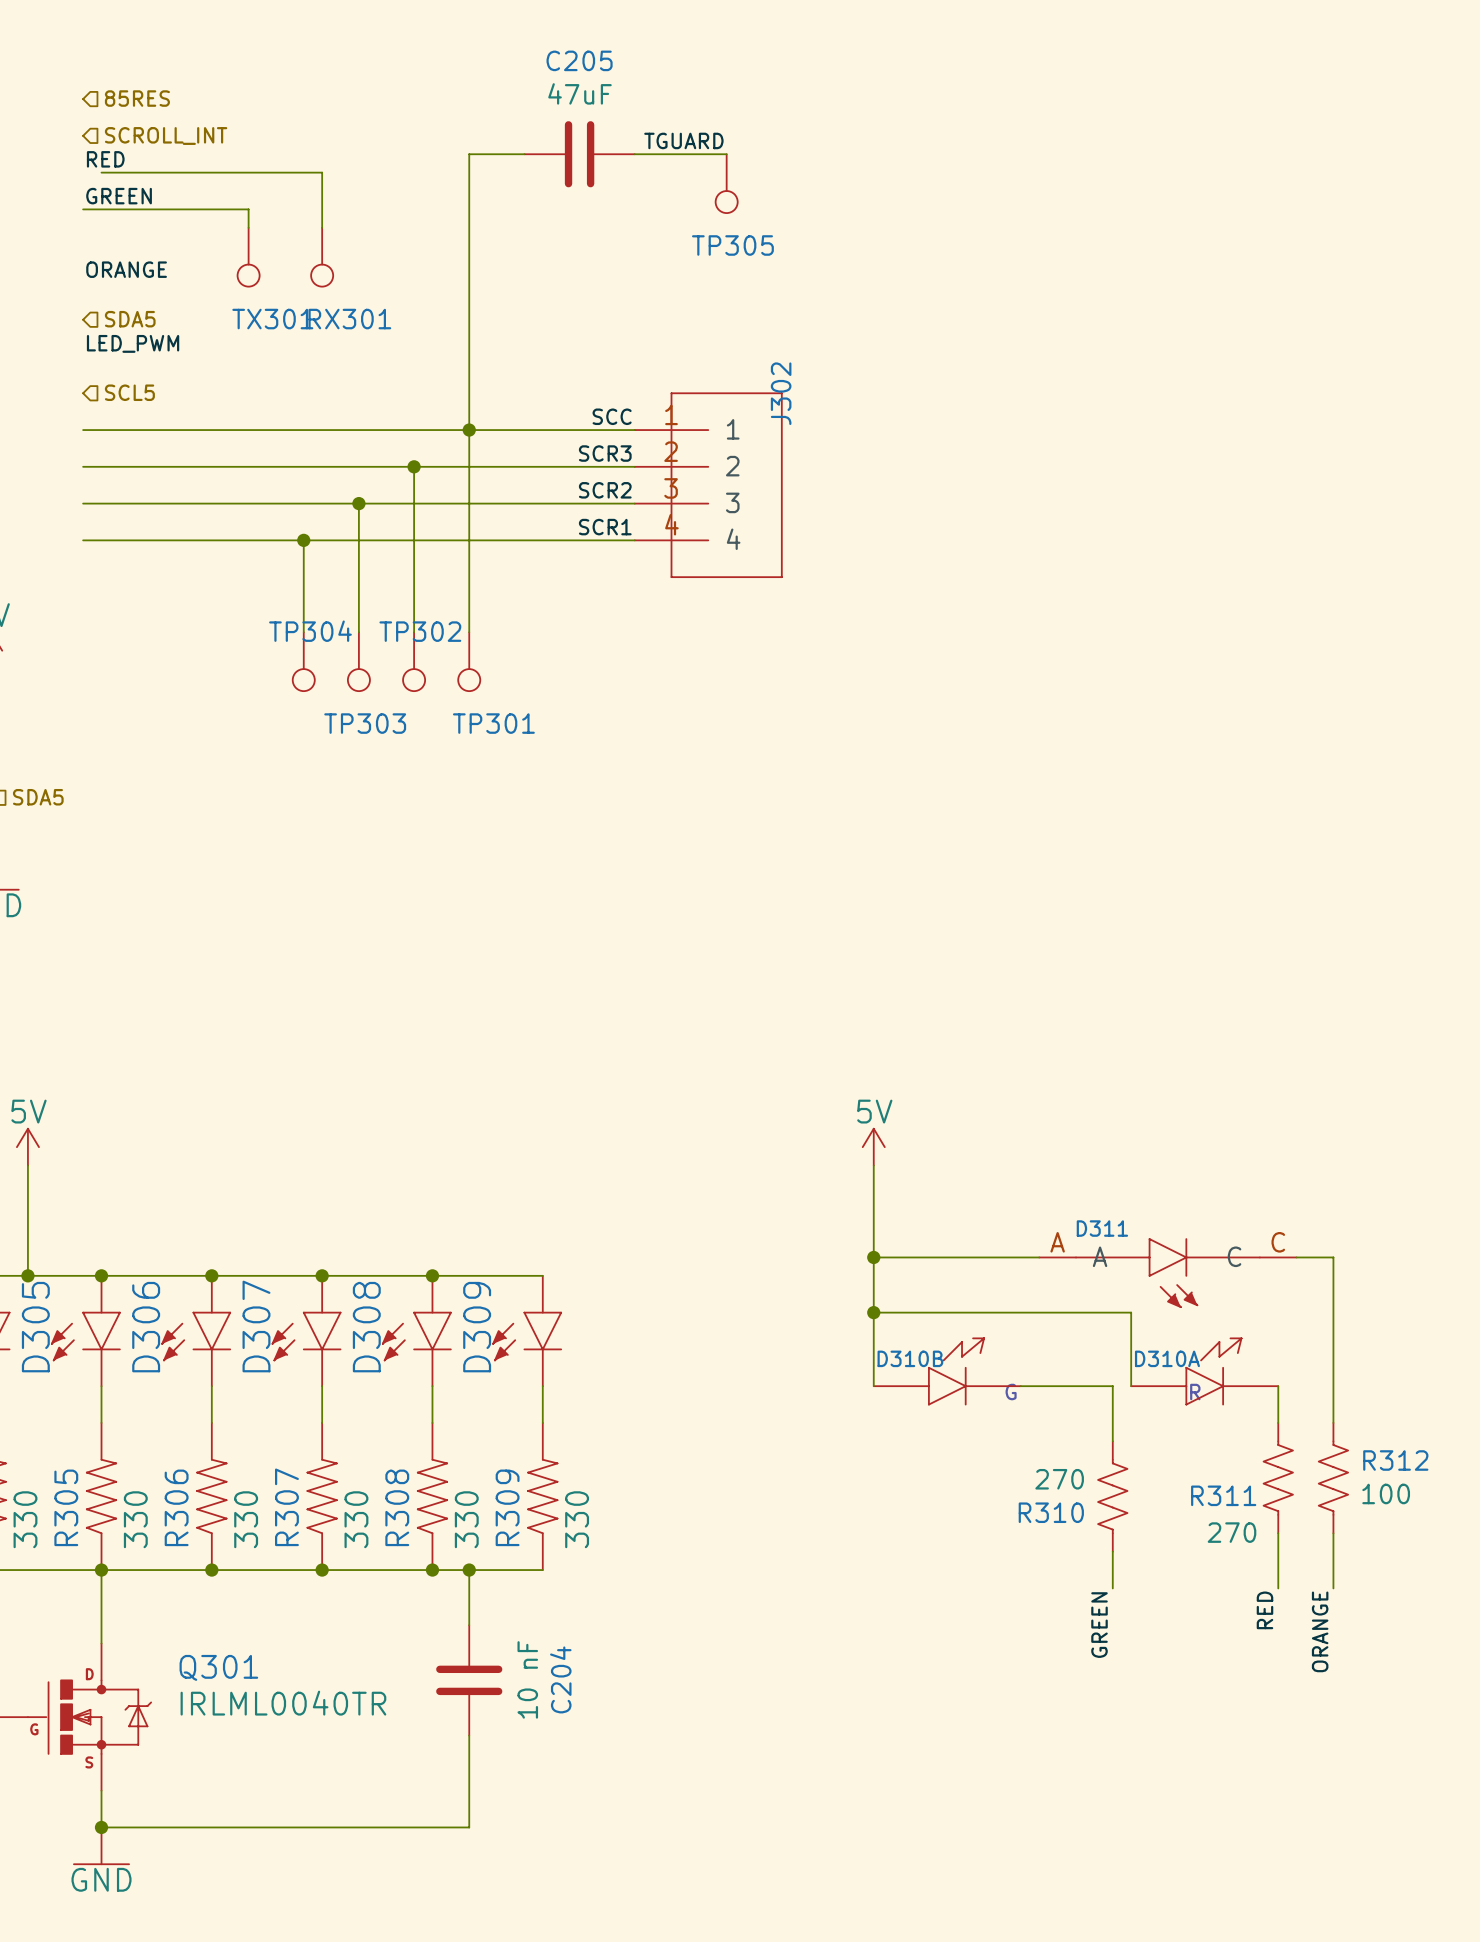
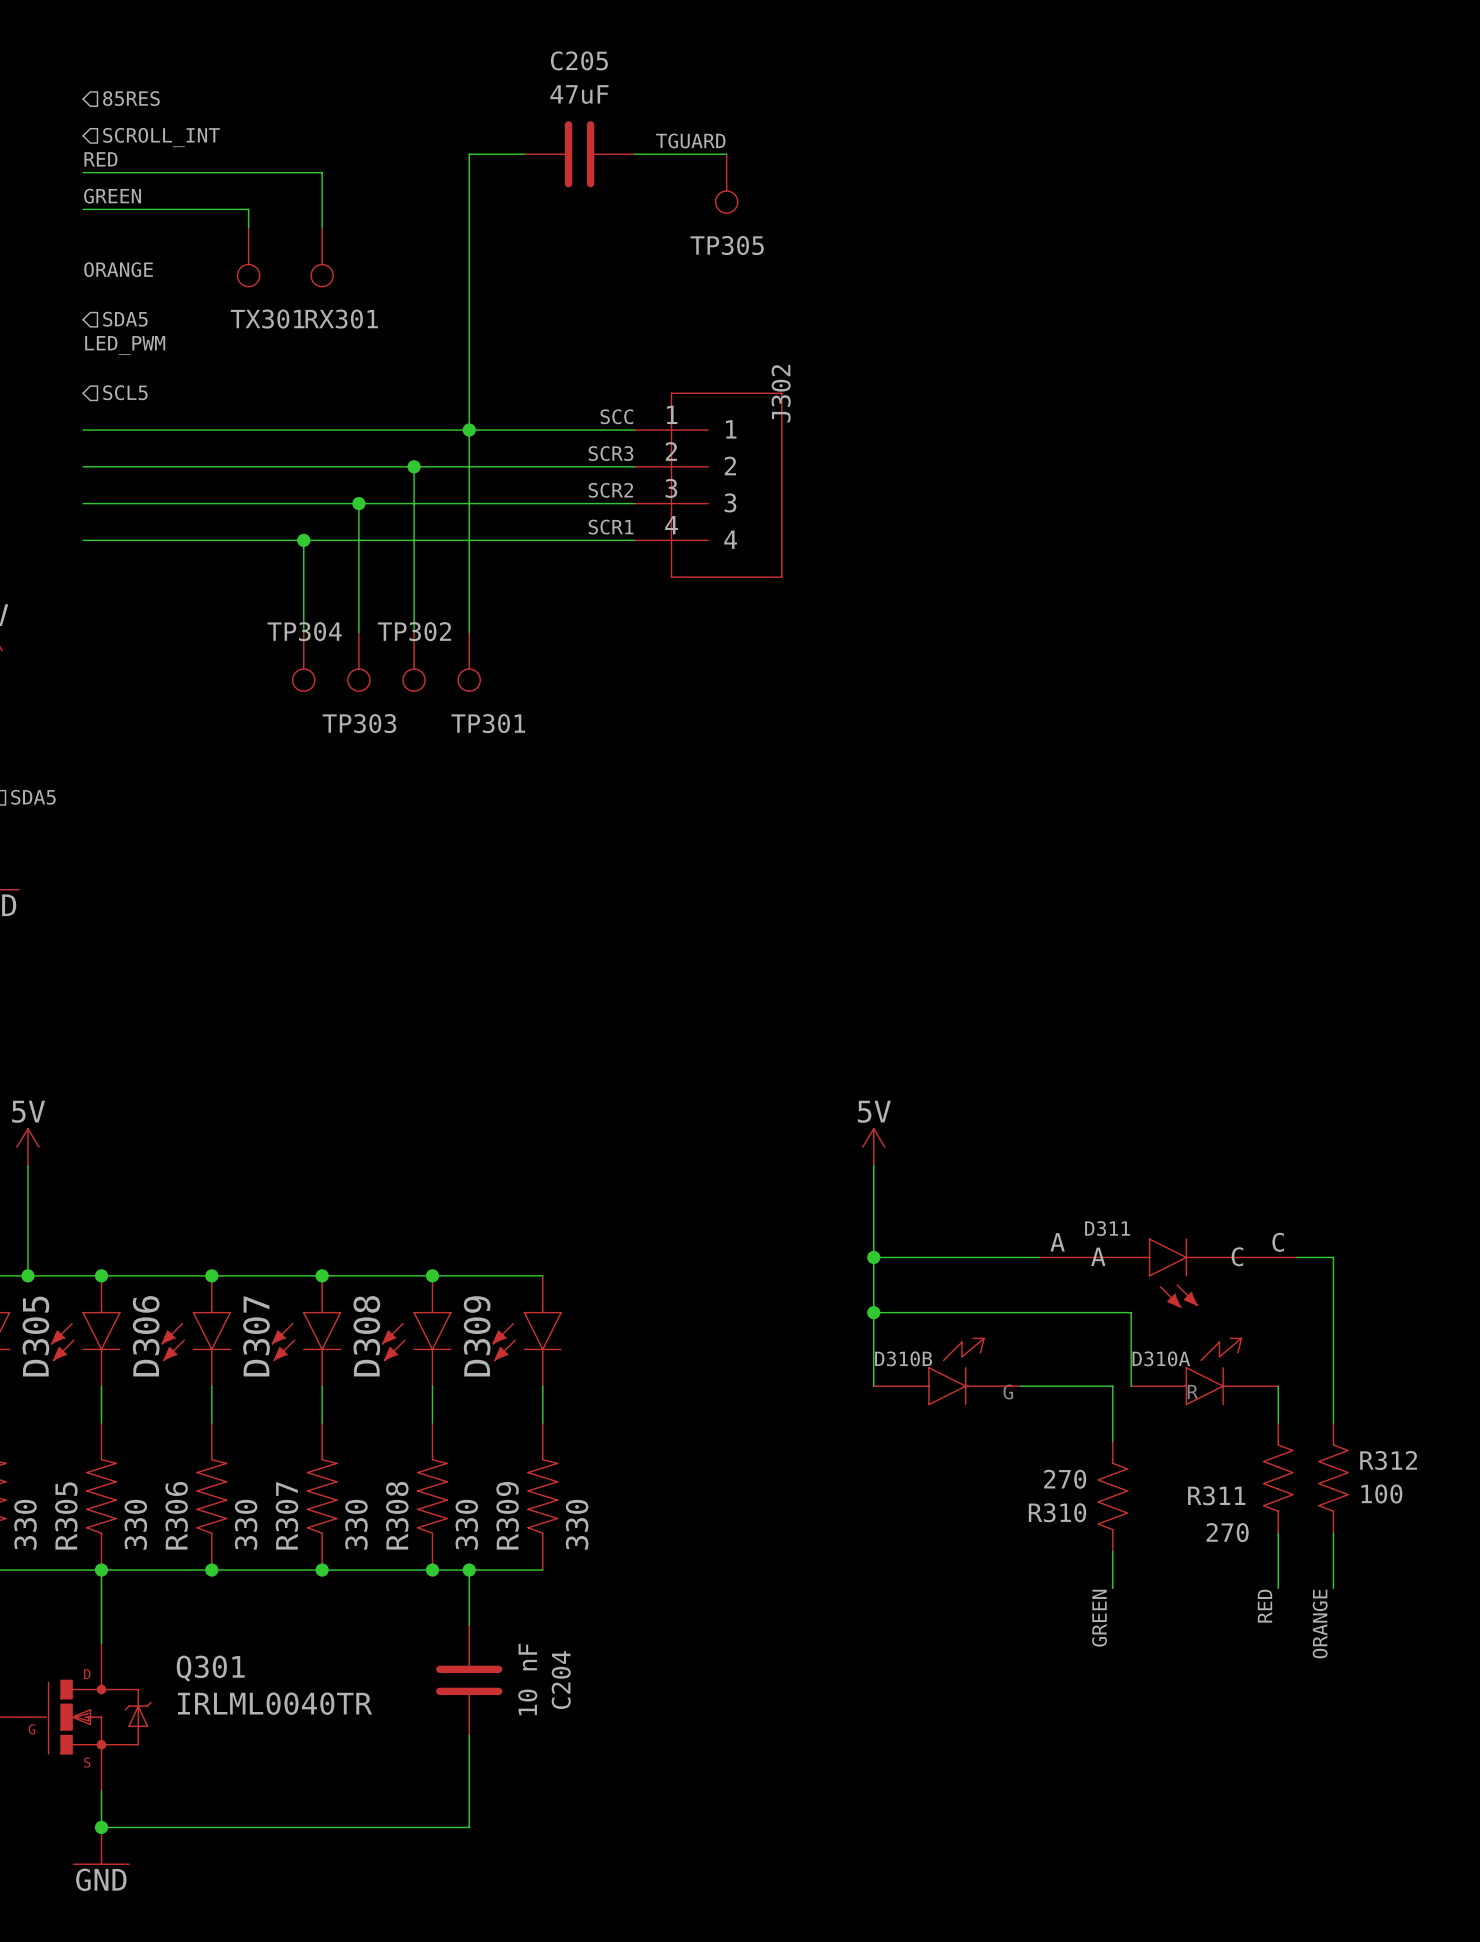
wire: none -> (83, 172) (101, 172)

